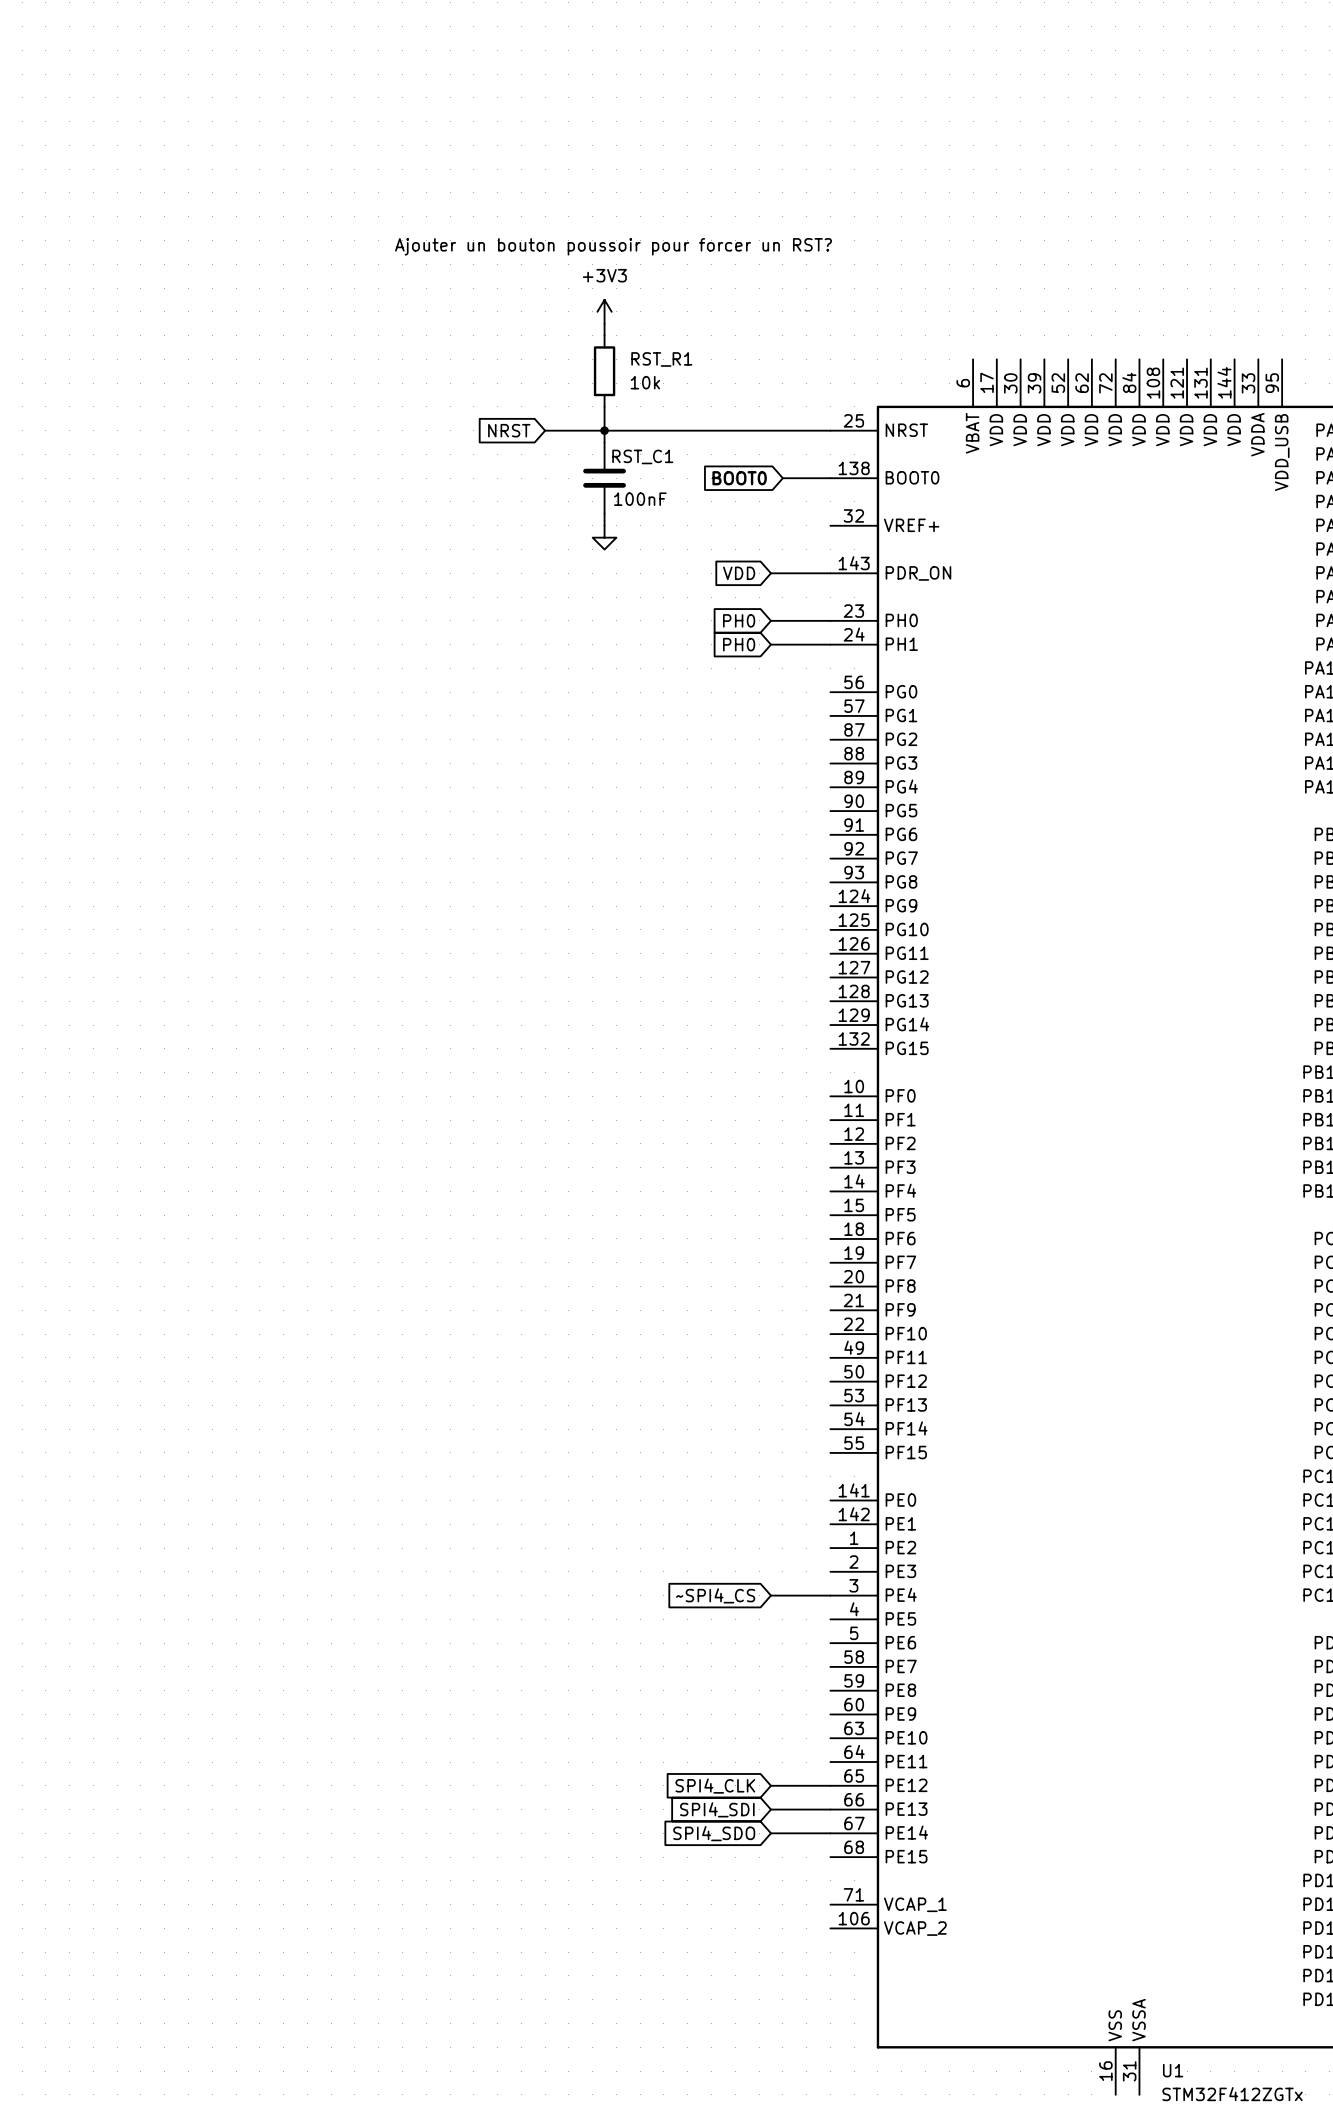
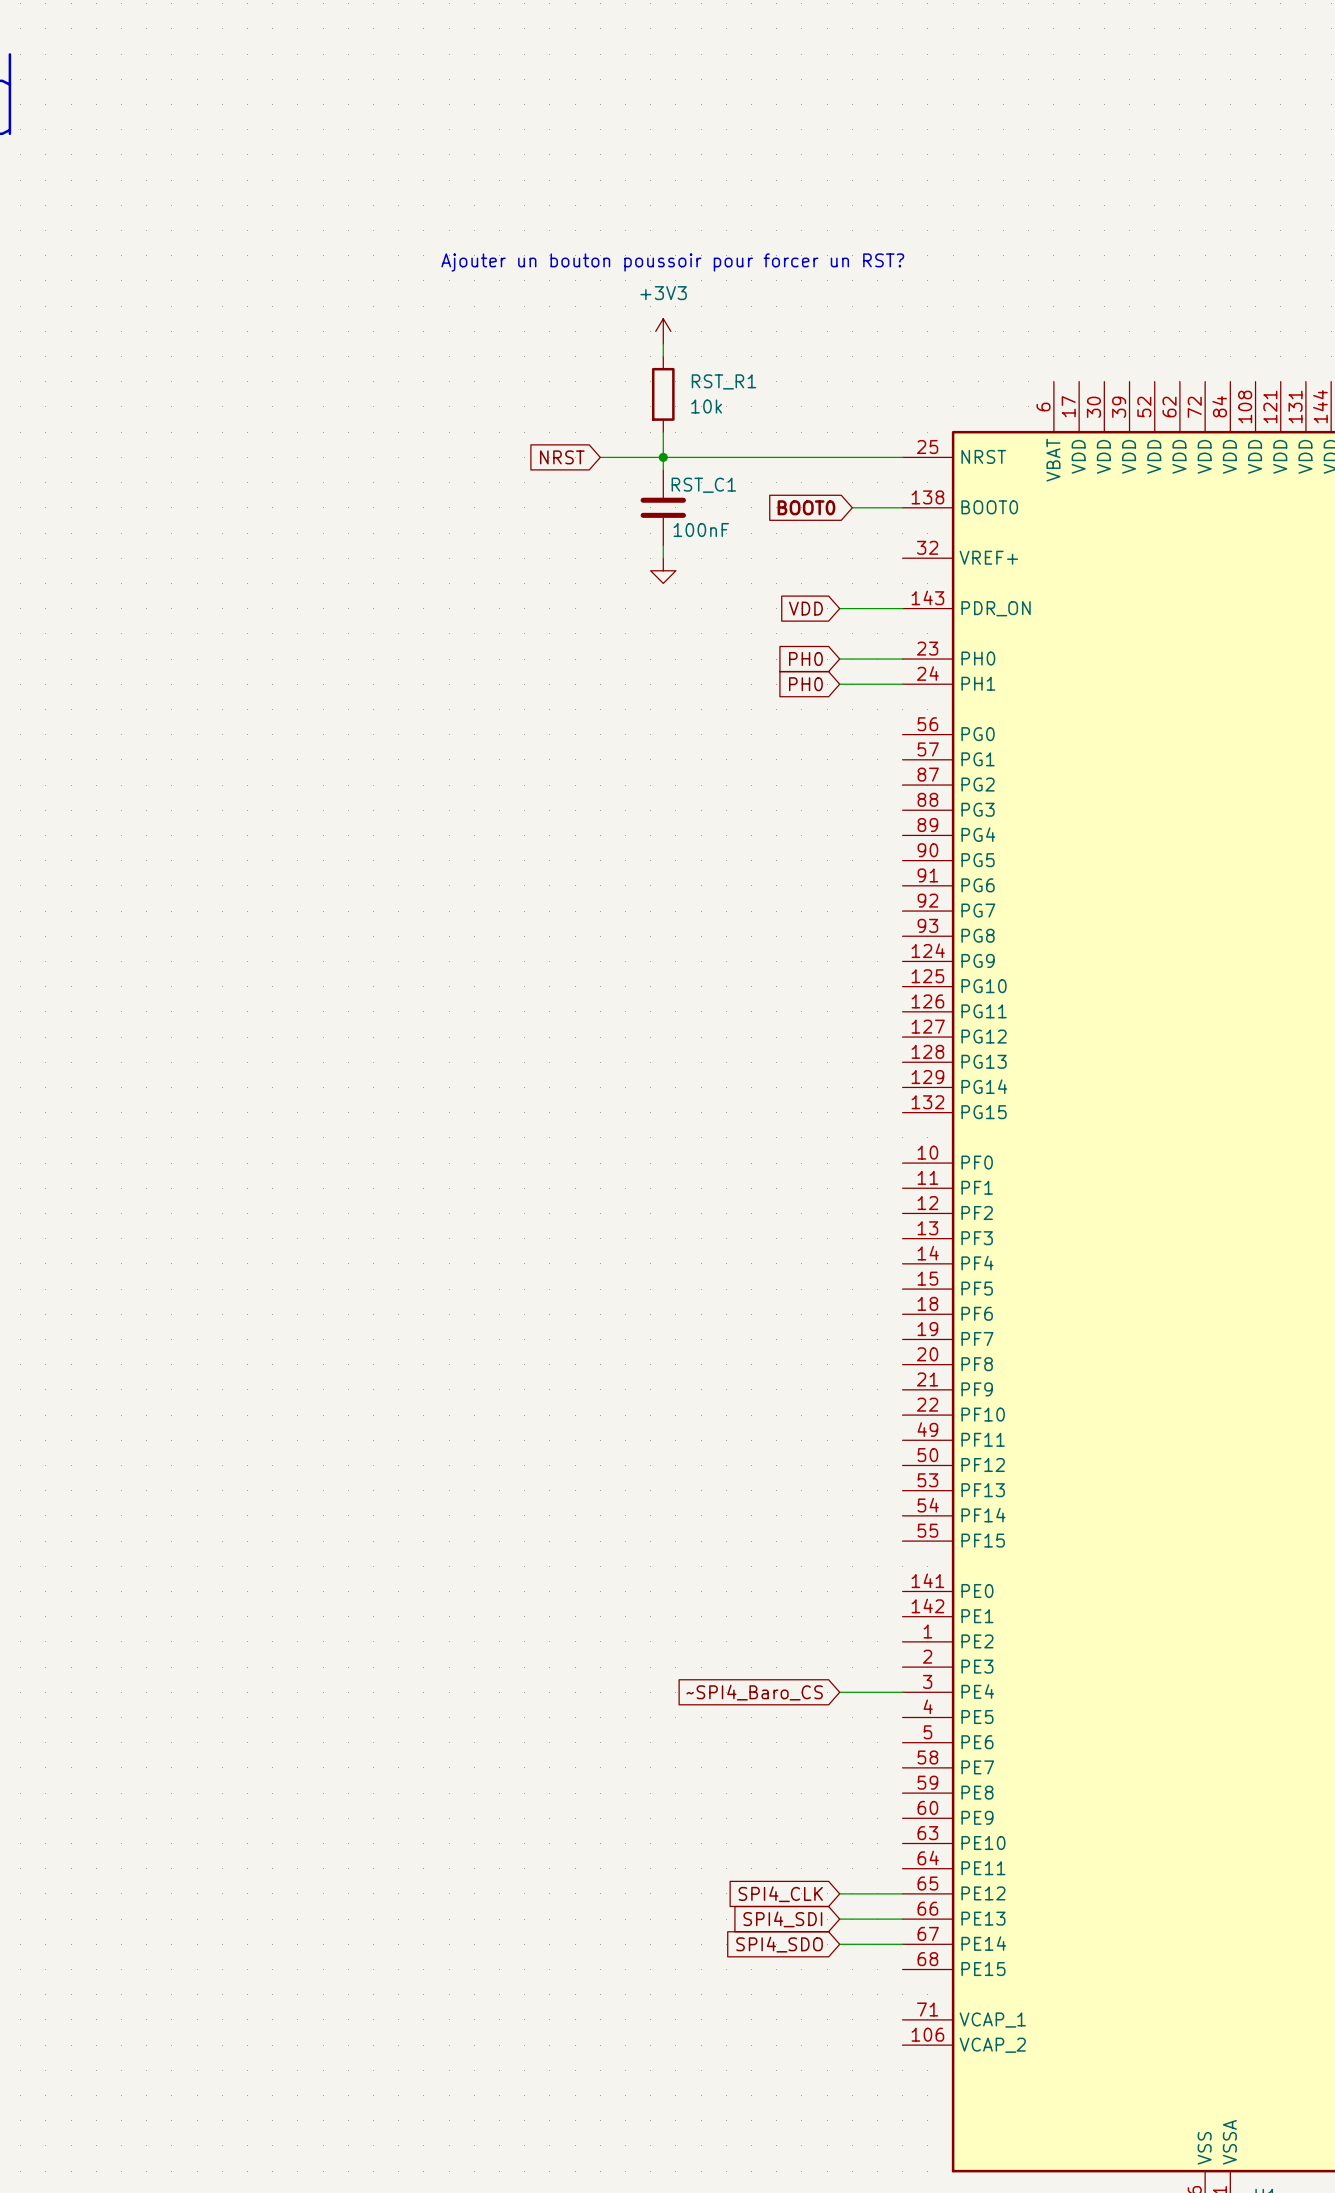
global label: ~SPI4_CS (715, 1595) -> ~SPI4_Baro_CS (754, 1692)

